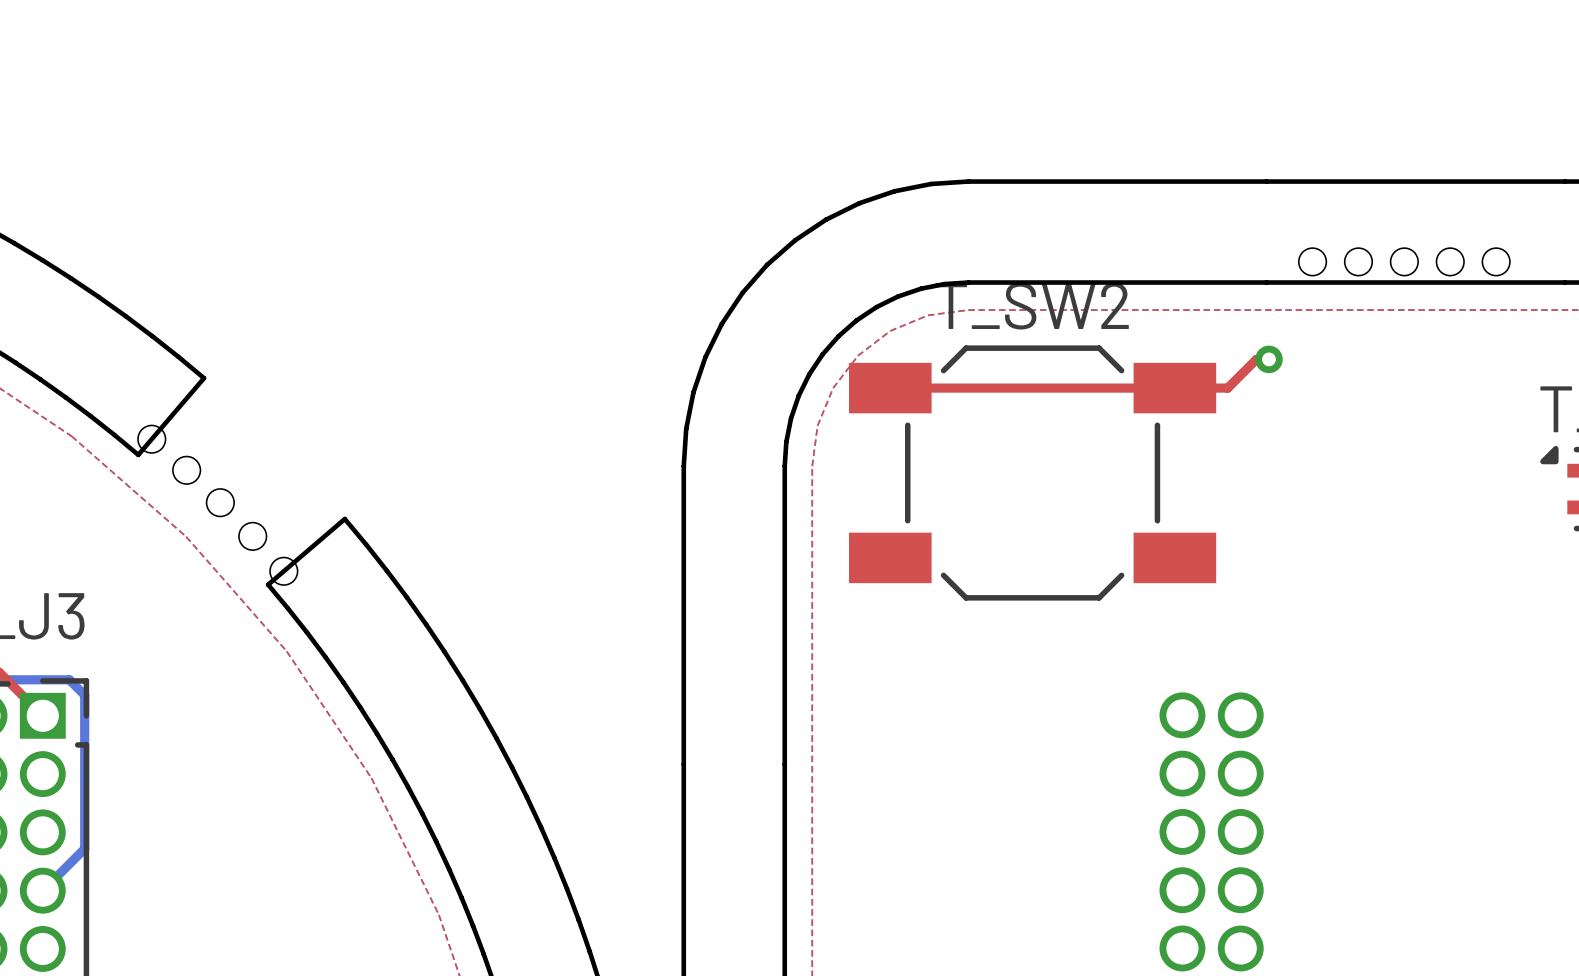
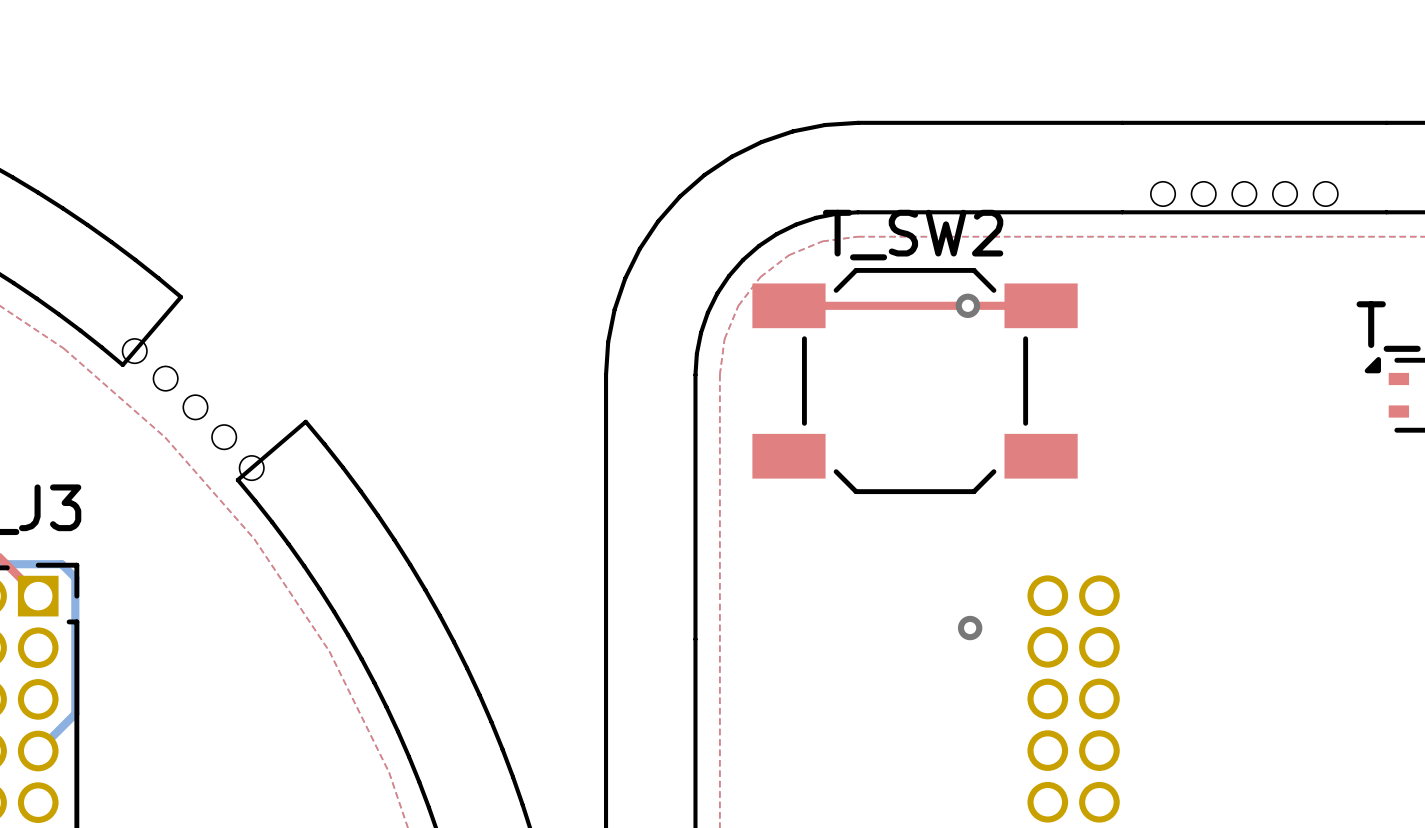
top track: (1268, 359) (1256, 359) (1227, 388) (1174, 388) -> none
via position: (1268, 359) -> (967, 305)
via: none -> (970, 628)

